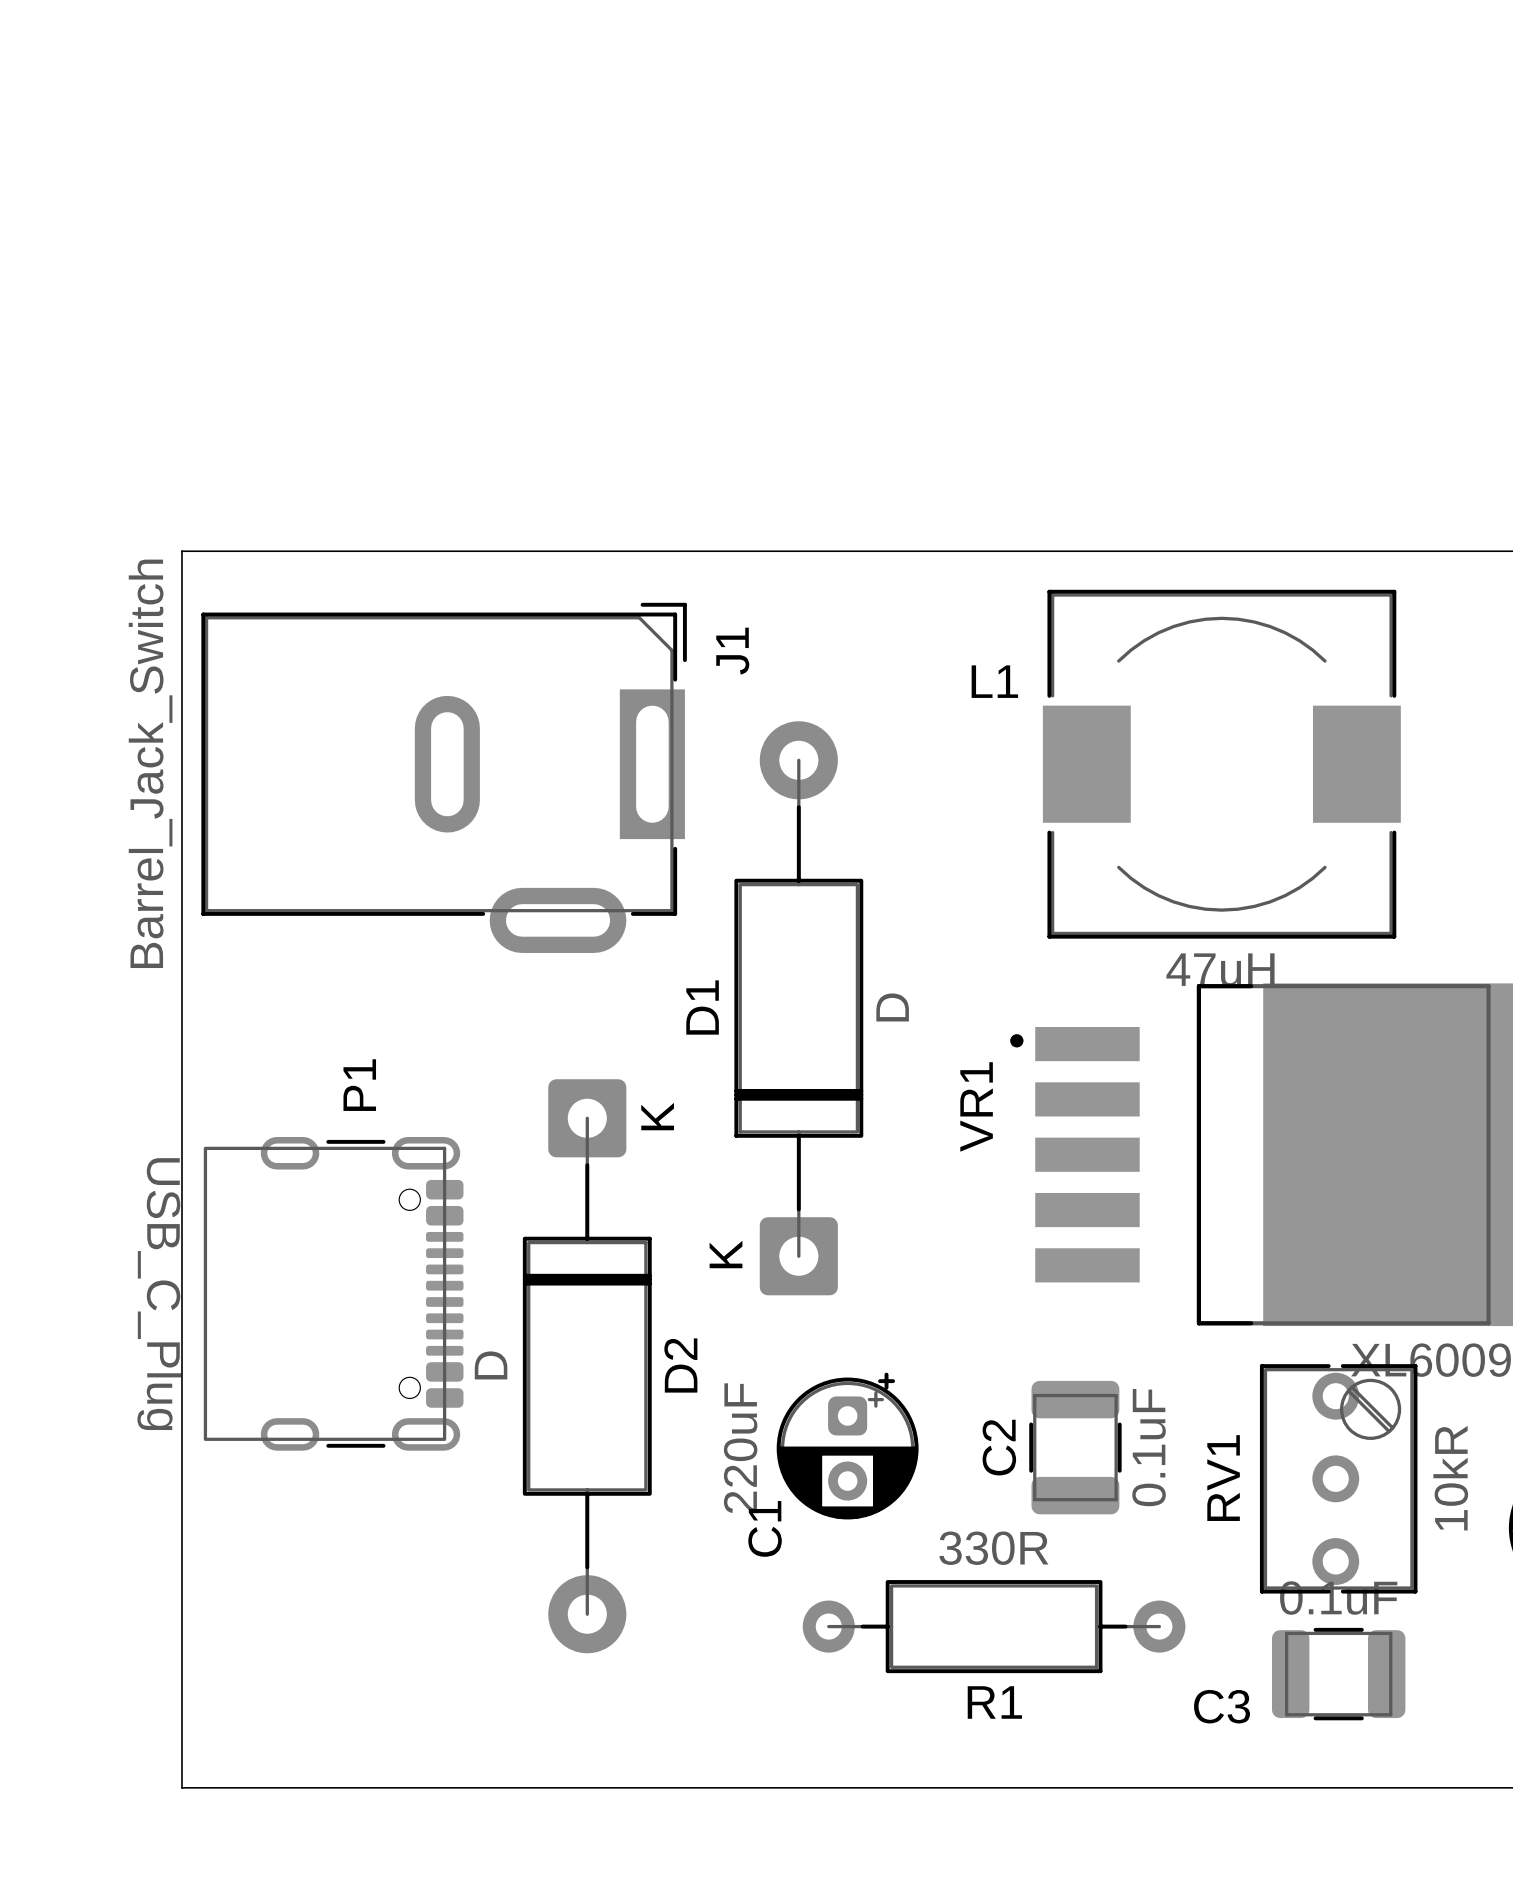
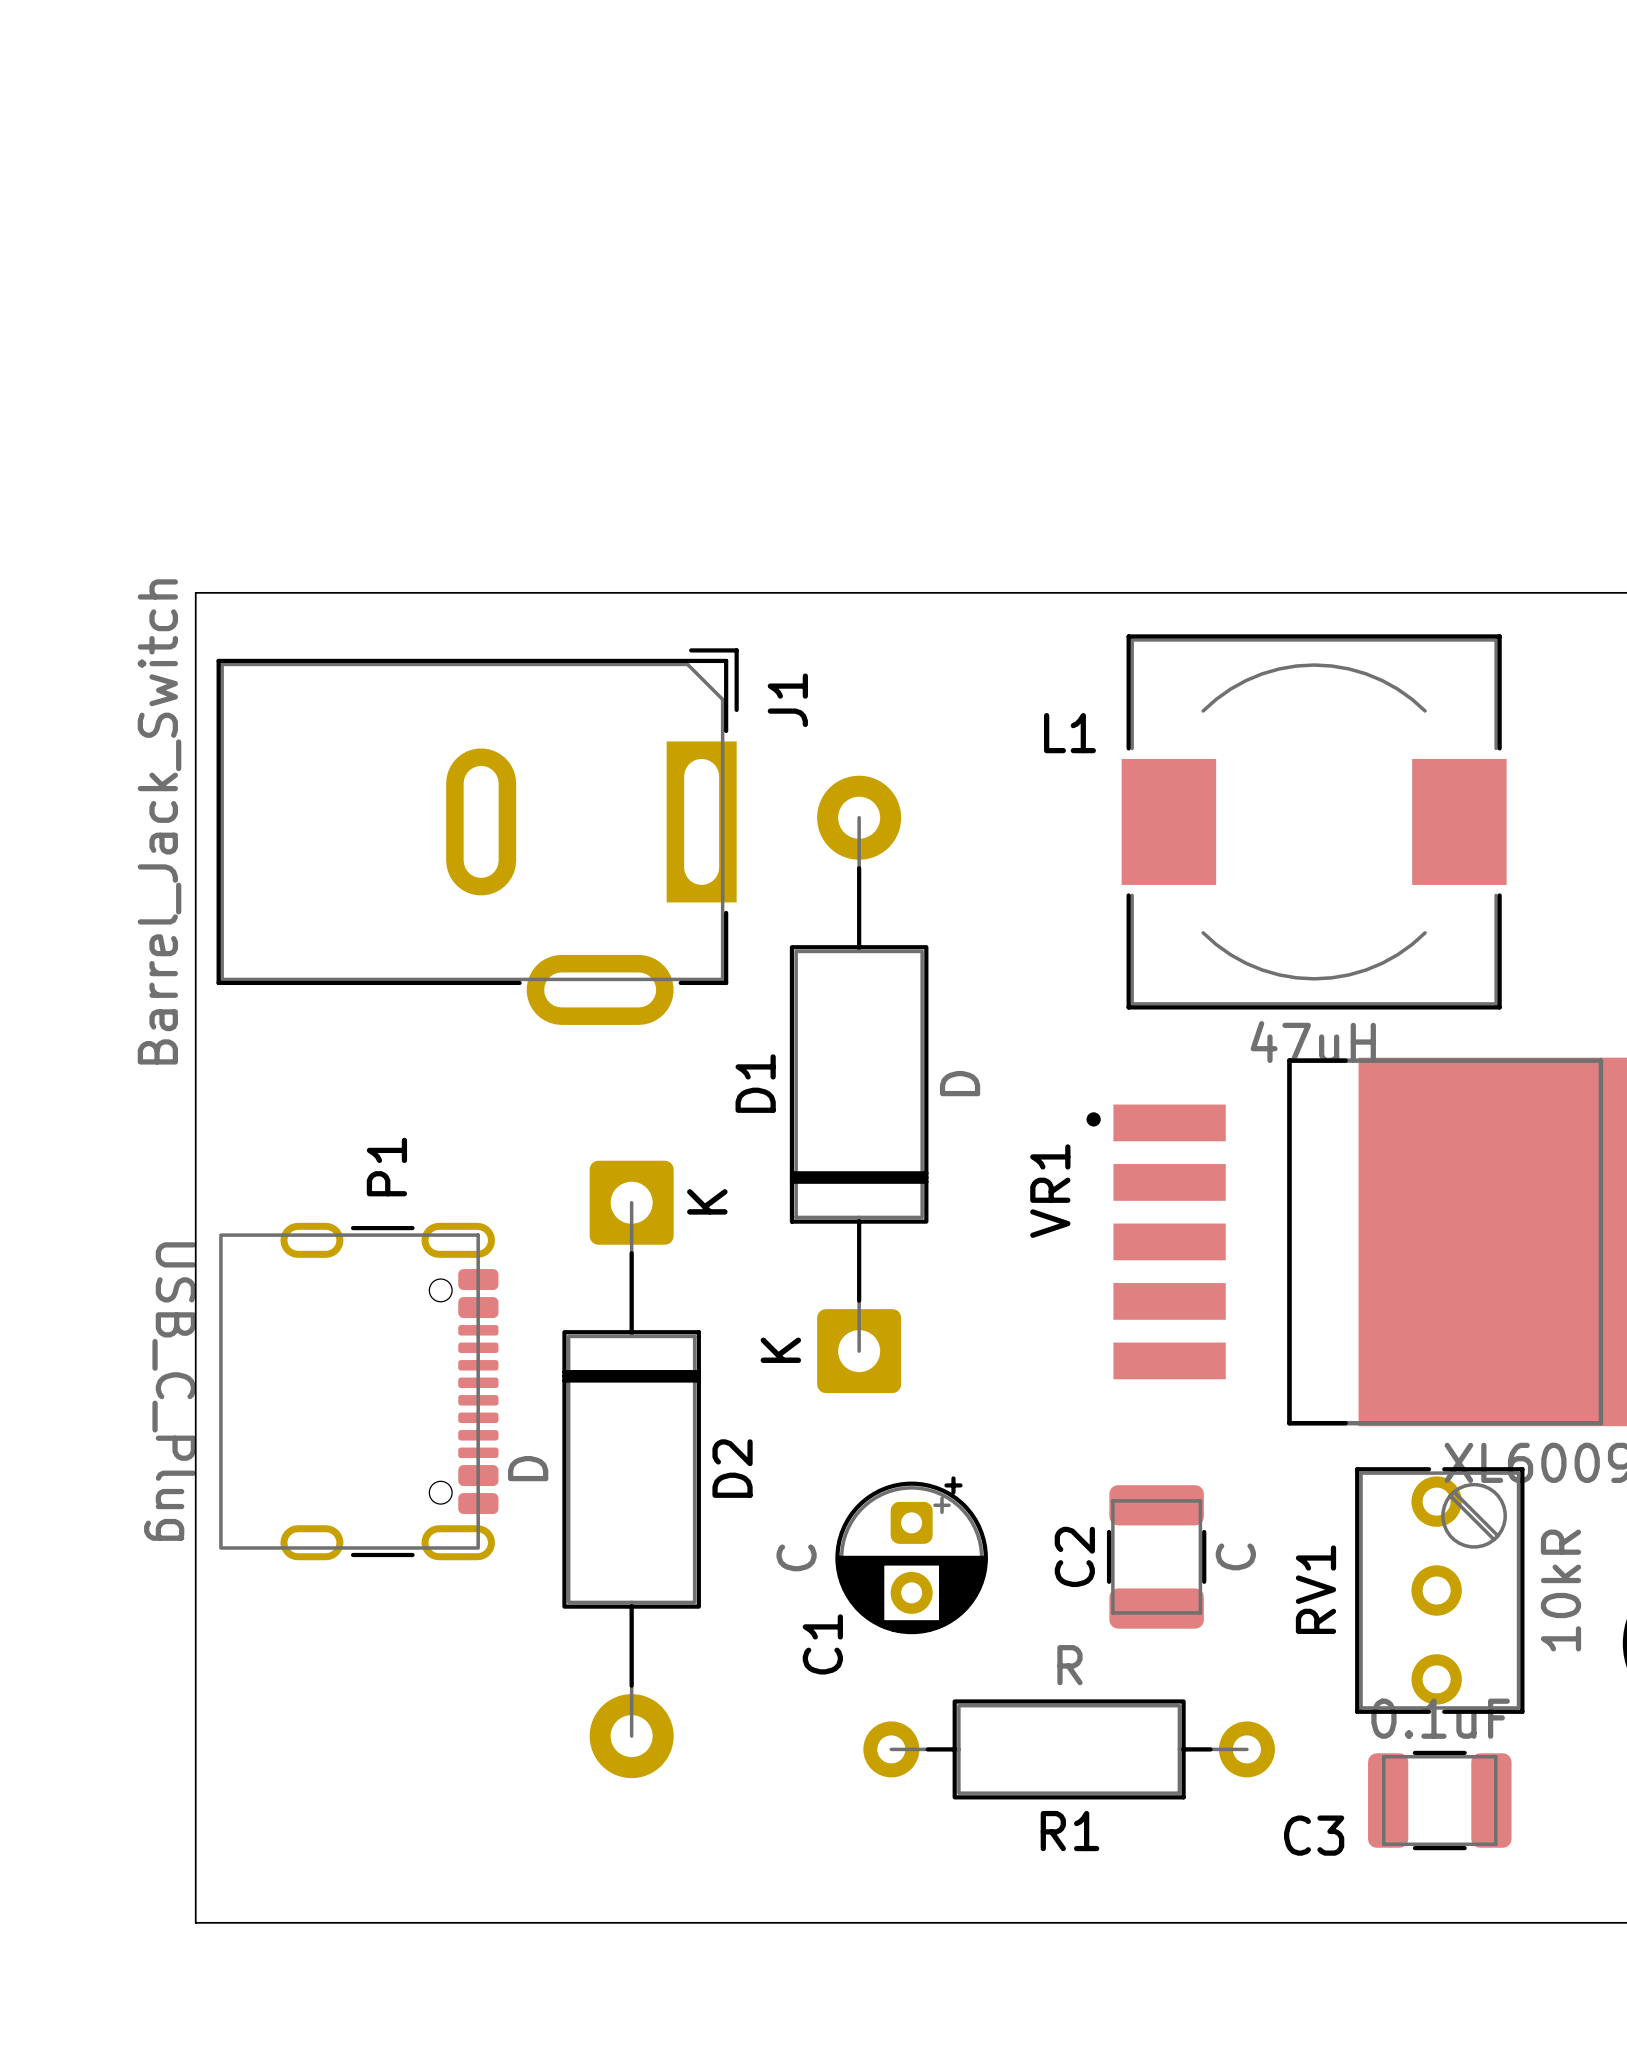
C2 value: 0.1uF (1149, 1447) -> C (1235, 1556)
C1 value: 220uF (740, 1448) -> C (796, 1557)
R1 value: 330R (993, 1548) -> R (1069, 1665)

